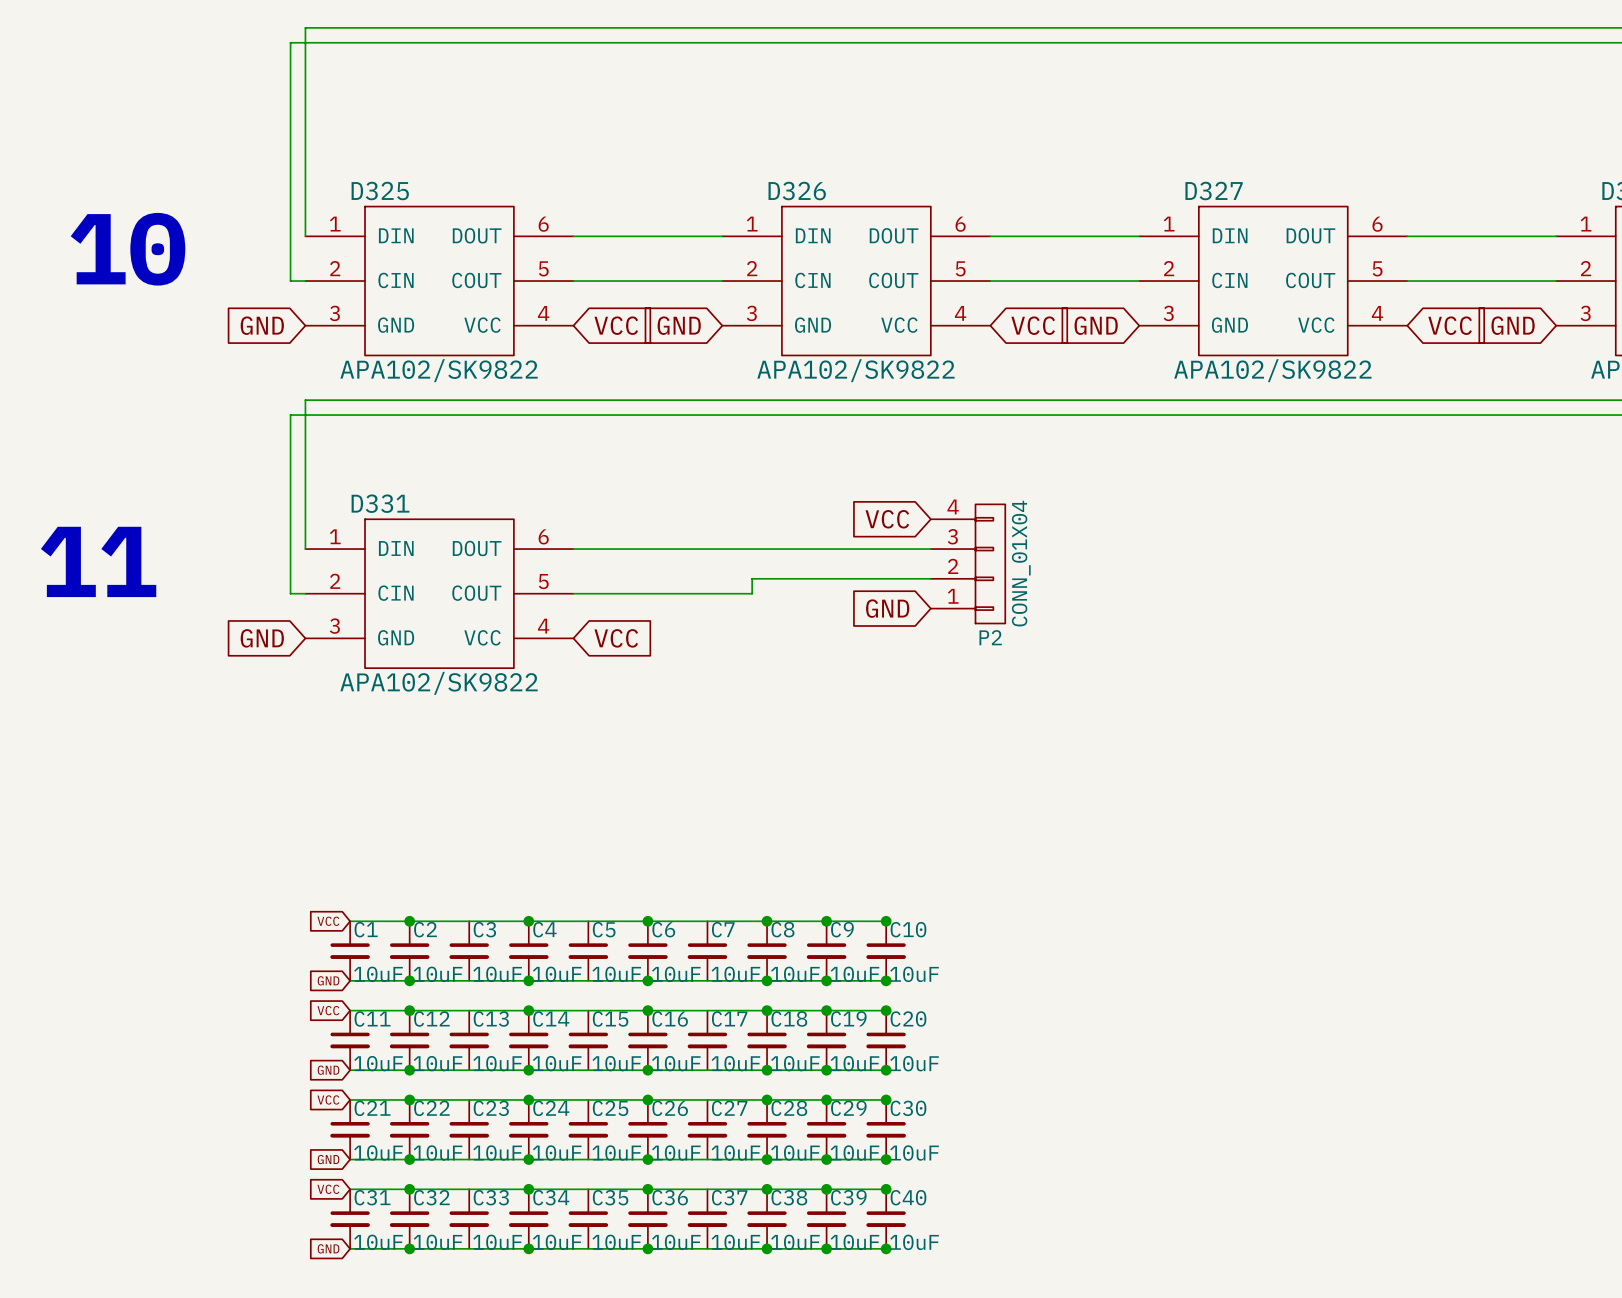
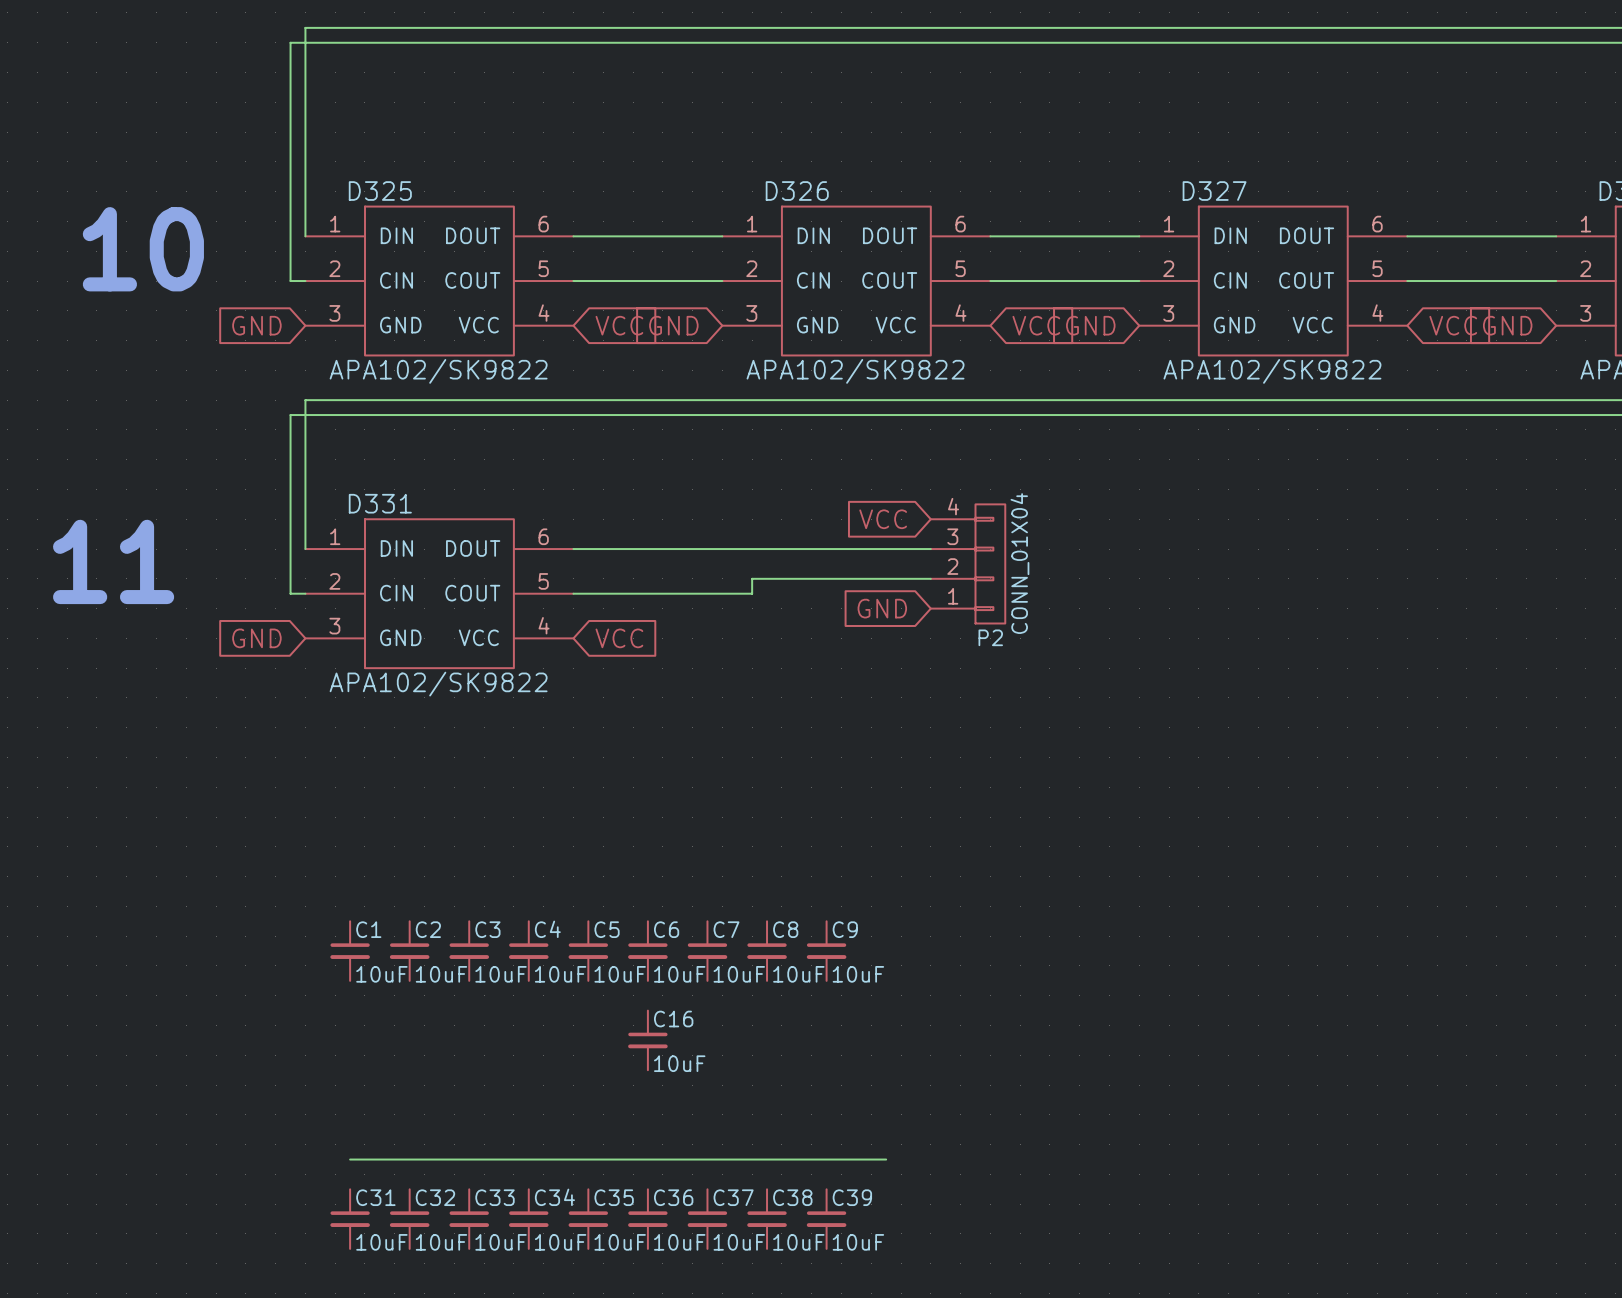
global label: VCC (328, 921) -> none
wire: (350, 921) (886, 921) -> none
junction: (409, 921) -> none
junction: (528, 921) -> none
junction: (647, 921) -> none
junction: (767, 921) -> none
junction: (826, 921) -> none
junction: (886, 921) -> none
C10: 10uF (886, 951) -> none
global label: GND (328, 980) -> none
wire: (350, 980) (886, 980) -> none
junction: (409, 980) -> none
junction: (528, 980) -> none
junction: (647, 980) -> none
junction: (767, 980) -> none
junction: (826, 980) -> none
junction: (886, 980) -> none
global label: VCC (328, 1010) -> none
wire: (350, 1010) (886, 1010) -> none
junction: (409, 1010) -> none
junction: (528, 1010) -> none
junction: (647, 1010) -> none
junction: (767, 1010) -> none
junction: (826, 1010) -> none
junction: (886, 1010) -> none
C11: 10uF (350, 1040) -> none
C12: 10uF (409, 1040) -> none
C13: 10uF (469, 1040) -> none
C14: 10uF (528, 1040) -> none
C15: 10uF (588, 1040) -> none
C17: 10uF (707, 1040) -> none
C18: 10uF (767, 1040) -> none
C19: 10uF (826, 1040) -> none
C20: 10uF (886, 1040) -> none
global label: GND (328, 1070) -> none
wire: (350, 1070) (886, 1070) -> none
junction: (409, 1070) -> none
junction: (528, 1070) -> none
junction: (647, 1070) -> none
junction: (767, 1070) -> none
junction: (826, 1070) -> none
junction: (886, 1070) -> none
global label: VCC (328, 1099) -> none
wire: (350, 1099) (886, 1099) -> none
junction: (409, 1099) -> none
junction: (528, 1099) -> none
junction: (647, 1099) -> none
junction: (767, 1099) -> none
junction: (826, 1099) -> none
junction: (886, 1099) -> none
C21: 10uF (350, 1129) -> none
C22: 10uF (409, 1129) -> none
C23: 10uF (469, 1129) -> none
C24: 10uF (528, 1129) -> none
C25: 10uF (588, 1129) -> none
C26: 10uF (647, 1129) -> none
C27: 10uF (707, 1129) -> none
C28: 10uF (767, 1129) -> none
C29: 10uF (826, 1129) -> none
C30: 10uF (886, 1129) -> none
global label: GND (328, 1159) -> none
junction: (409, 1159) -> none
junction: (528, 1159) -> none
junction: (647, 1159) -> none
junction: (767, 1159) -> none
junction: (826, 1159) -> none
junction: (886, 1159) -> none
global label: VCC (328, 1189) -> none
wire: (350, 1189) (886, 1189) -> none
junction: (409, 1189) -> none
junction: (528, 1189) -> none
junction: (647, 1189) -> none
junction: (767, 1189) -> none
junction: (826, 1189) -> none
junction: (886, 1189) -> none
C40: 10uF (886, 1219) -> none
global label: GND (328, 1248) -> none
wire: (350, 1248) (886, 1248) -> none
junction: (409, 1248) -> none
junction: (528, 1248) -> none
junction: (647, 1248) -> none
junction: (767, 1248) -> none
junction: (826, 1248) -> none
junction: (886, 1248) -> none

